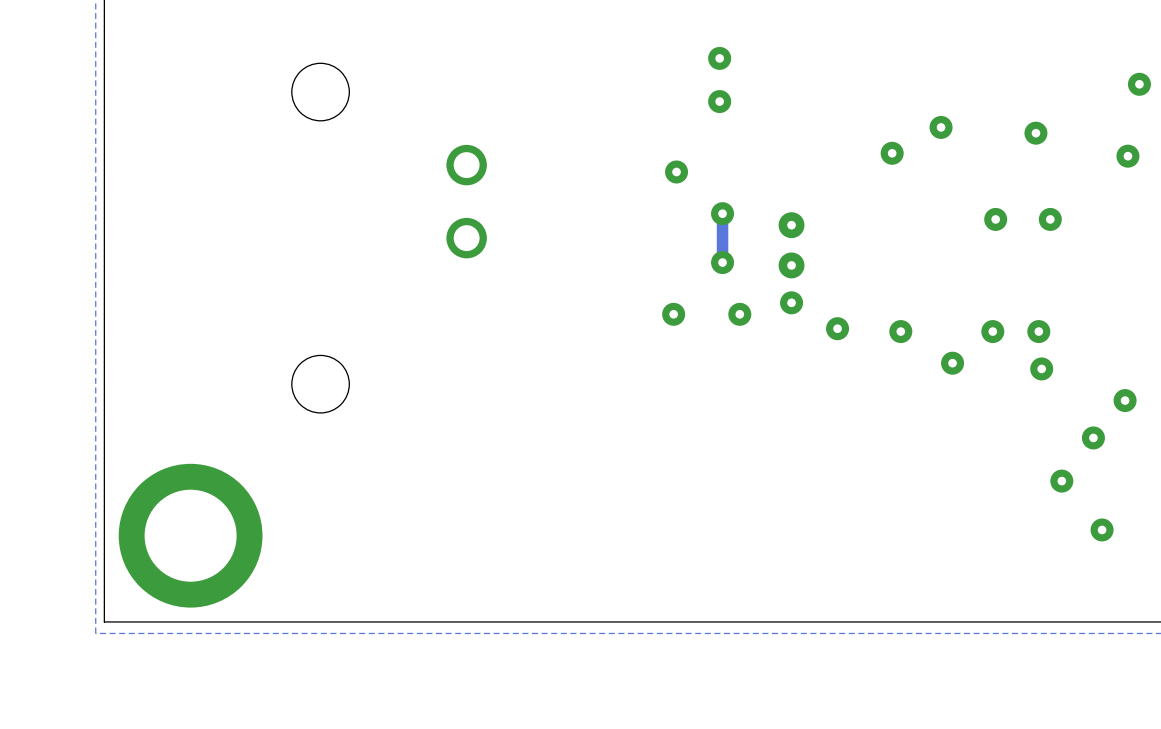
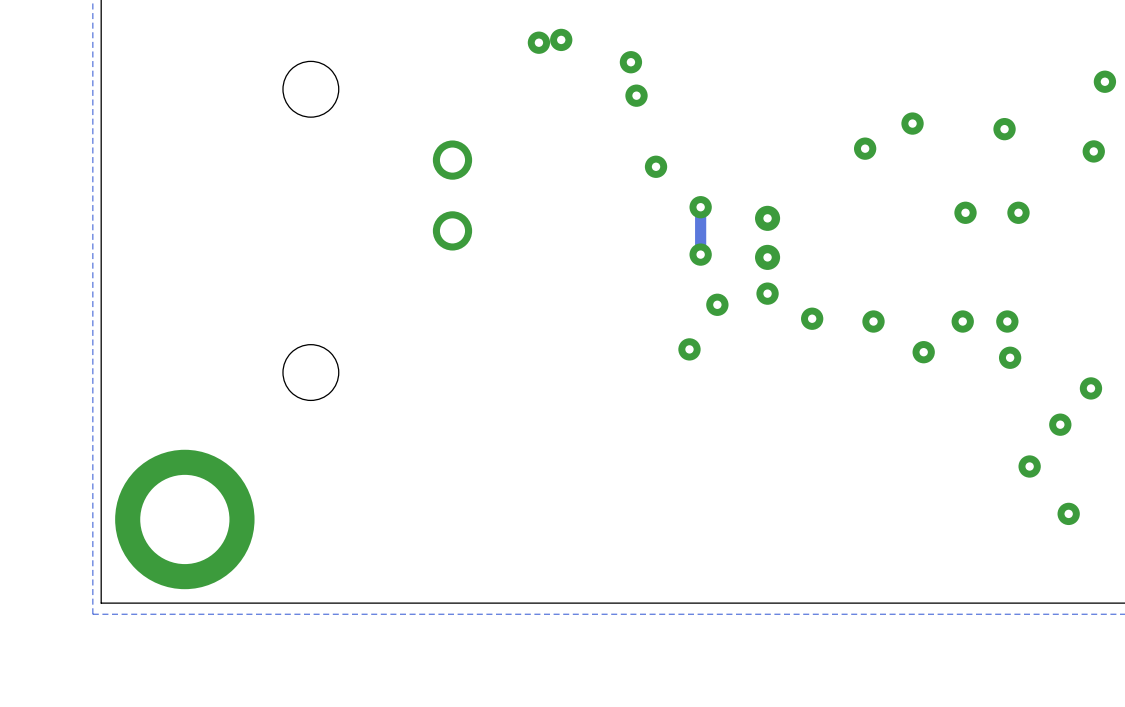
via: none -> (561, 39)
via: none -> (538, 42)
via: (719, 58) -> none
via: none -> (630, 62)
via: none -> (636, 95)
via: (719, 101) -> none
via position: (673, 314) -> (689, 349)

